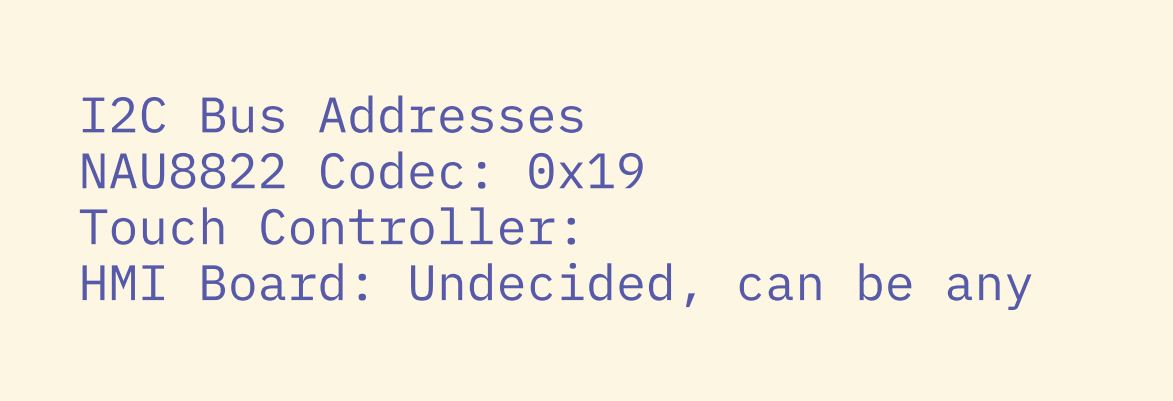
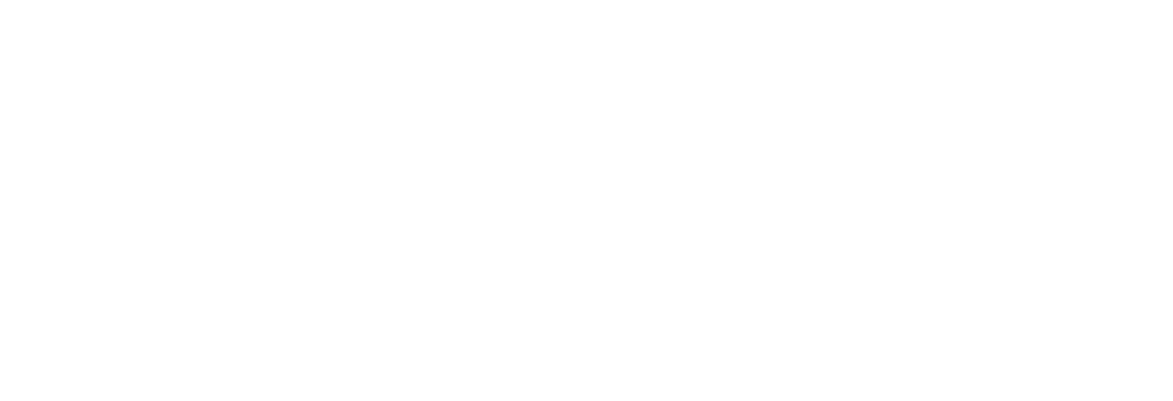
text: I2C Bus Addresses (332, 114) -> none
text: NAU8822 Codec: 0x19 (362, 170) -> none
text: Touch Controller: (327, 226) -> none
text: HMI Board: Undecided, can be any (557, 286) -> none

